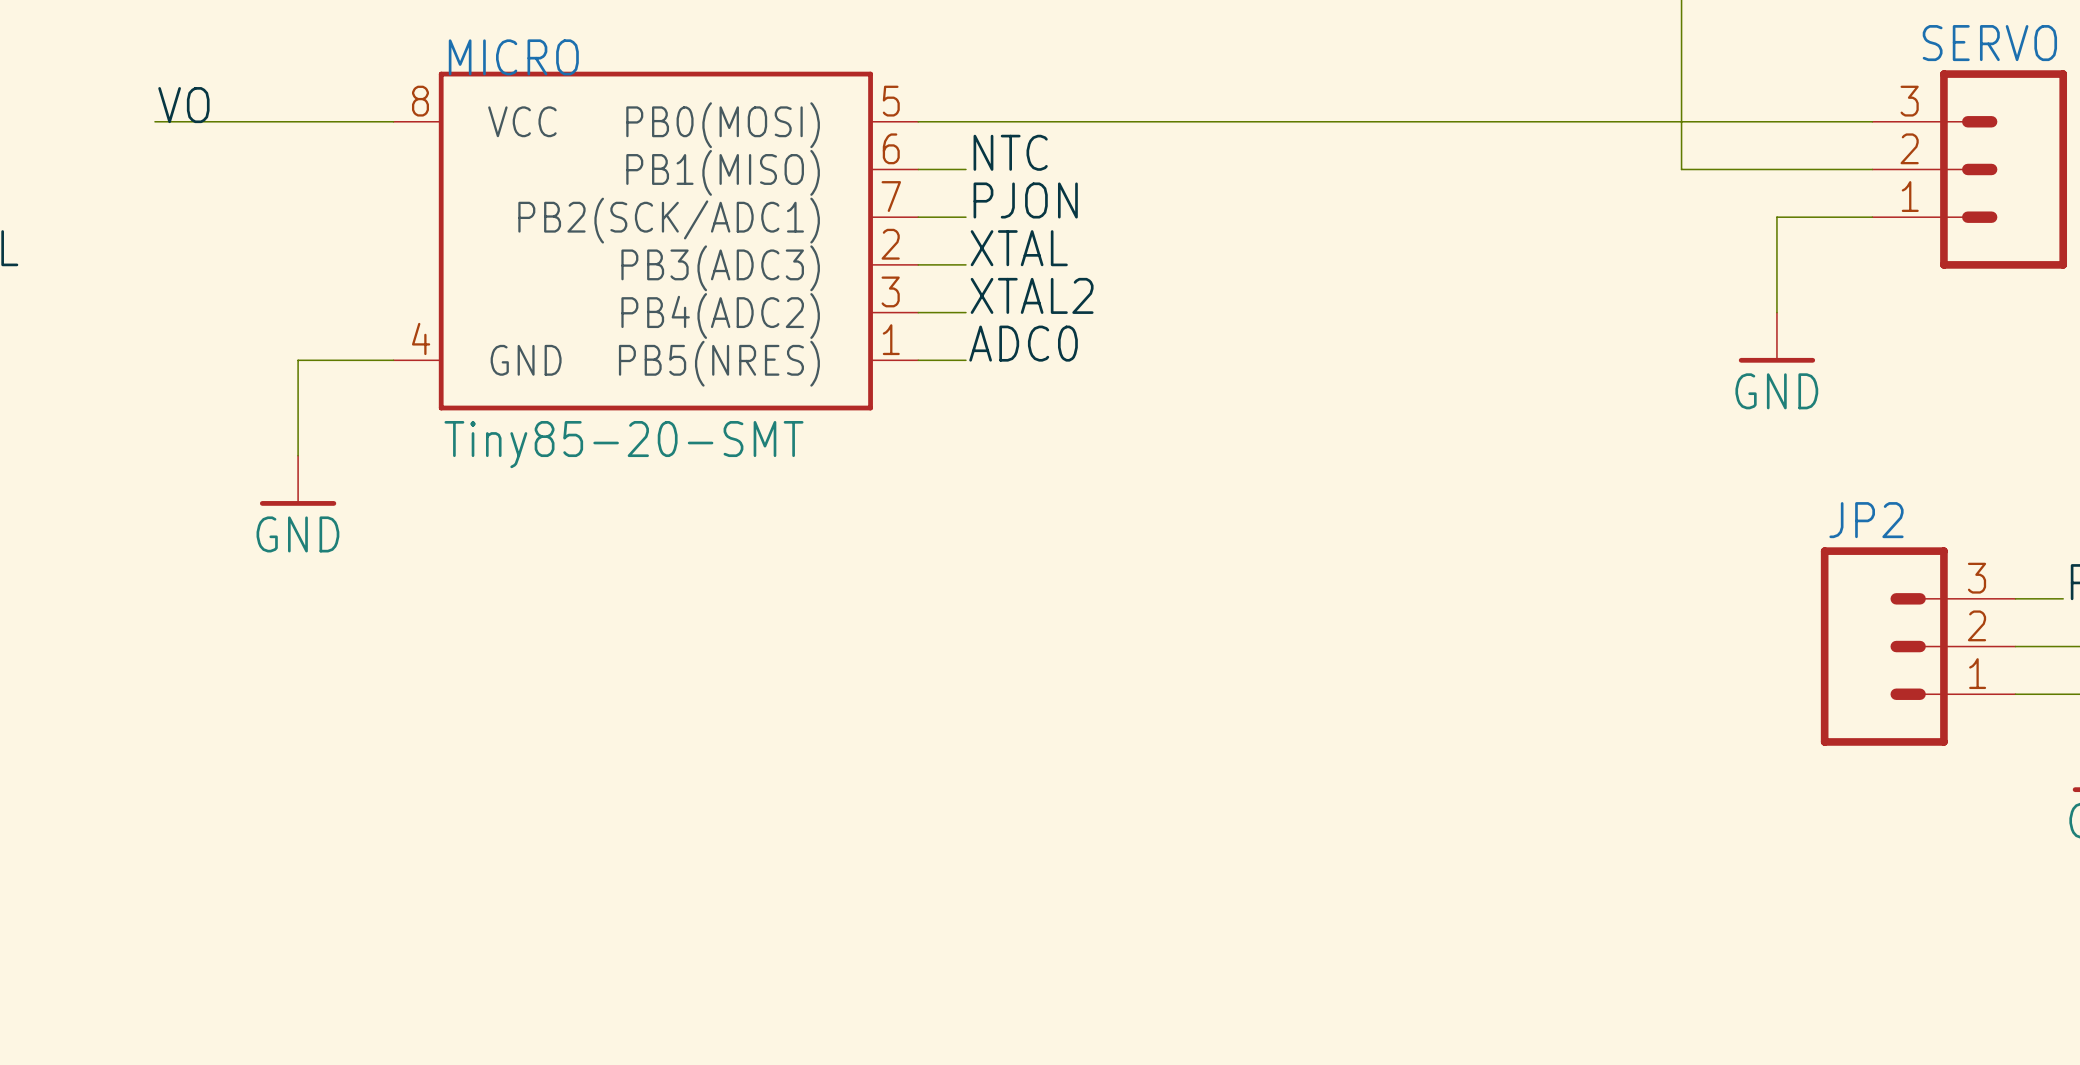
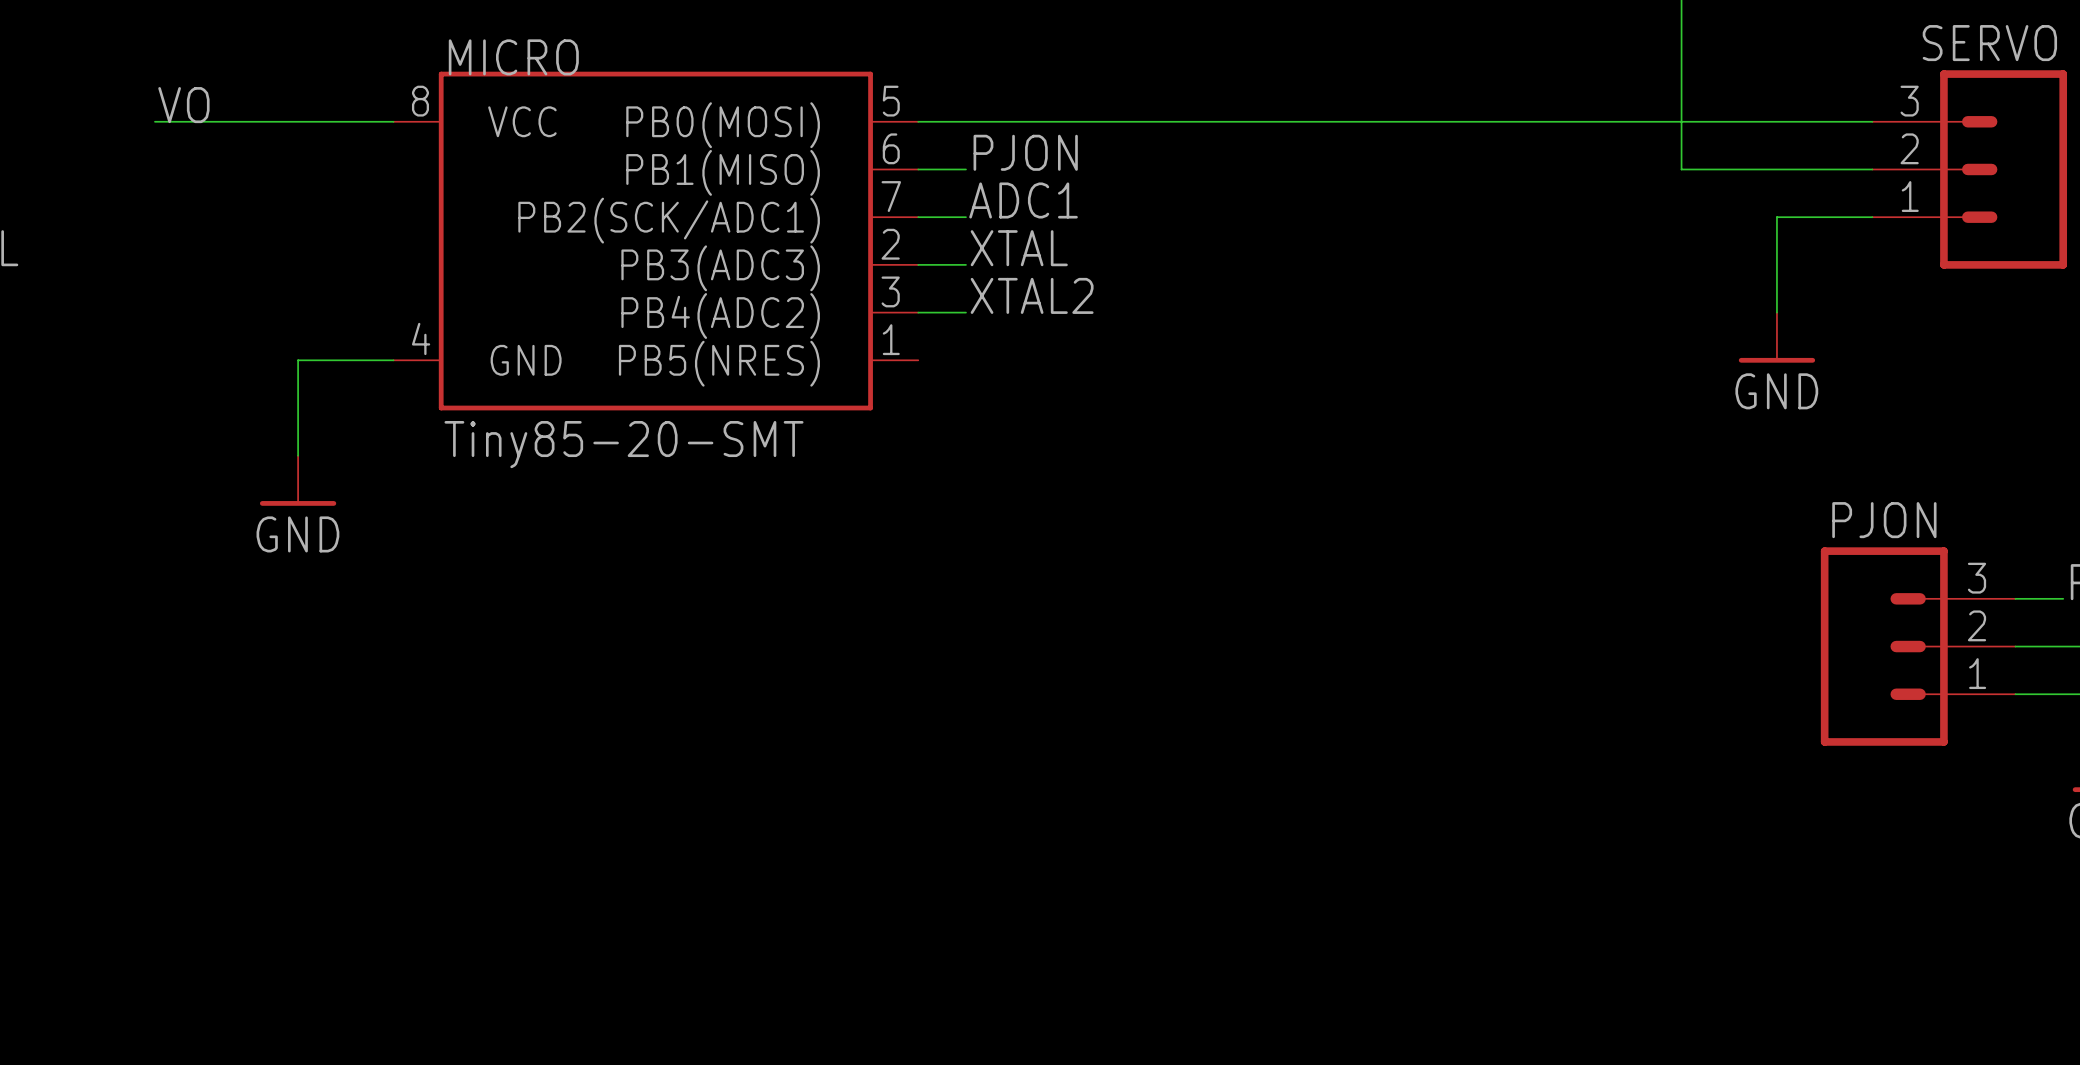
label: NTC (1010, 152) -> PJON (1025, 152)
label: PJON (1025, 200) -> ADC1 (1023, 200)
label: ADC0 (1023, 343) -> none
wire: (918, 360) (965, 360) -> none
JP2 name: JP2 (1866, 520) -> PJON (1884, 520)

